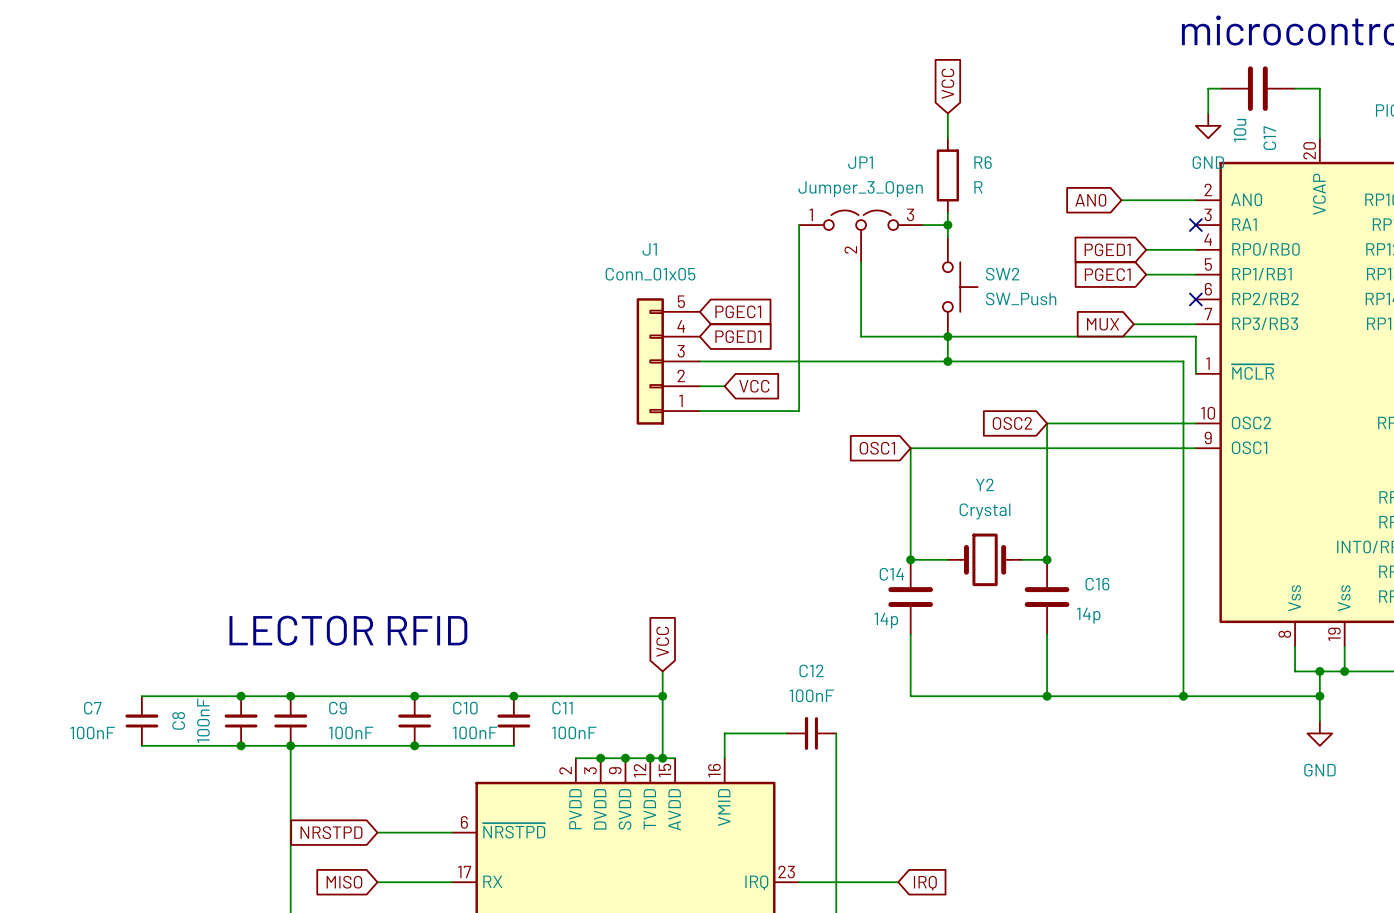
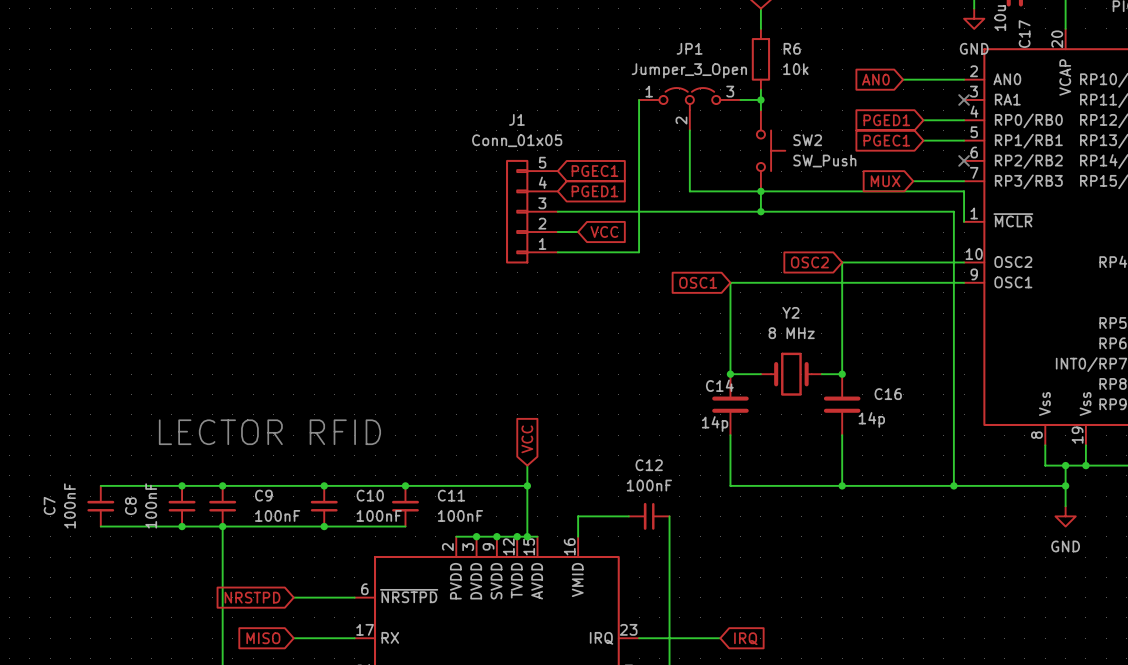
R6 value: R (978, 187) -> 10k (795, 69)
Y2 value: Crystal (985, 511) -> 8 MHz (791, 333)
C7 name rotation: 0° (92, 708) -> 90° counterclockwise (49, 505)
C7 value rotation: 0° (92, 732) -> 90° counterclockwise (69, 505)

